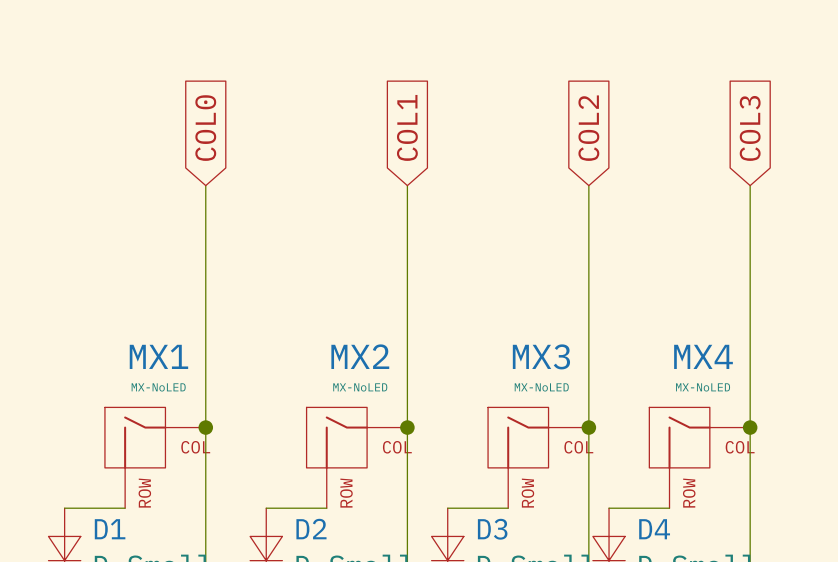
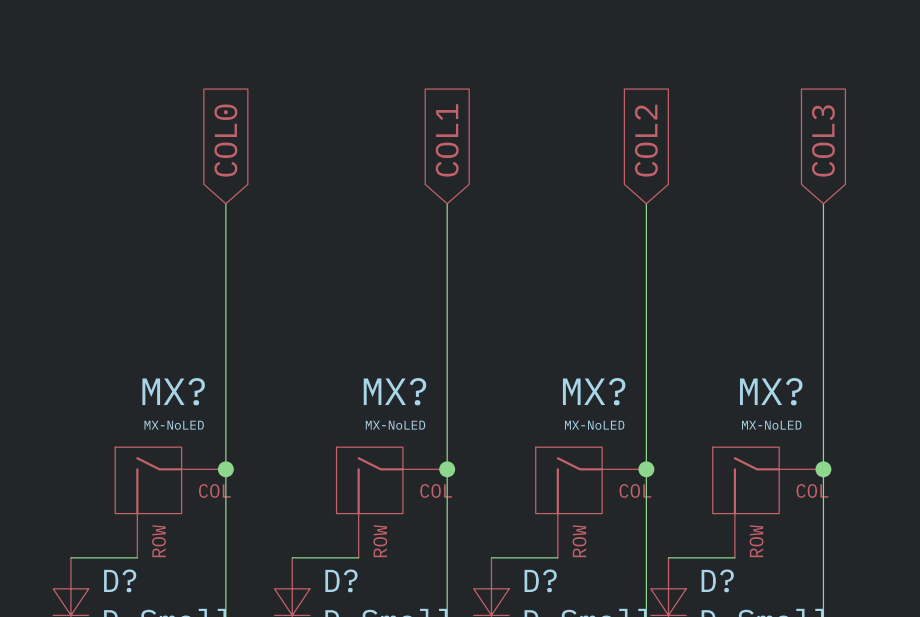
MX1 name: MX1 (158, 356) -> MX? (173, 391)
MX2 name: MX2 (360, 356) -> MX? (394, 391)
MX3 name: MX3 (541, 356) -> MX? (594, 391)
MX4 name: MX4 (703, 356) -> MX? (771, 391)
D1 name: D1 (110, 529) -> D? (120, 580)
D2 name: D2 (311, 529) -> D? (341, 580)
D3 name: D3 (492, 529) -> D? (540, 580)
D4 name: D4 (654, 529) -> D? (717, 580)

